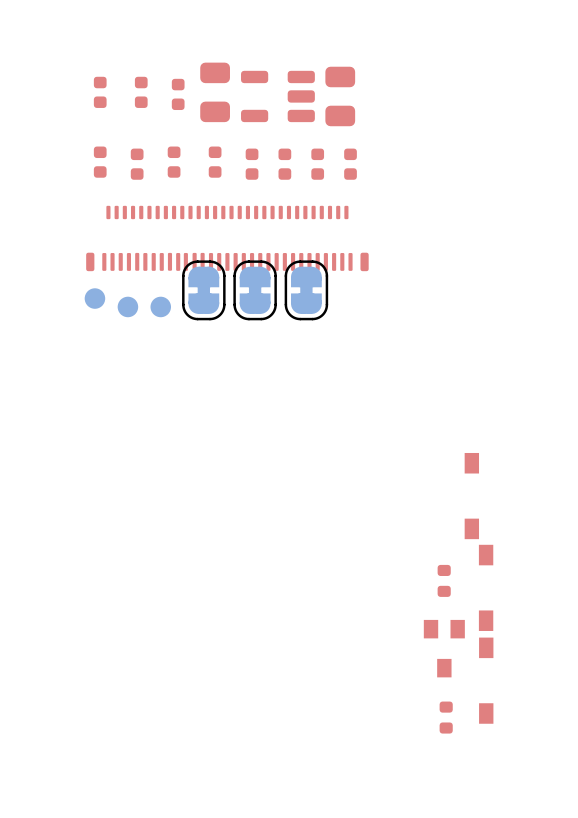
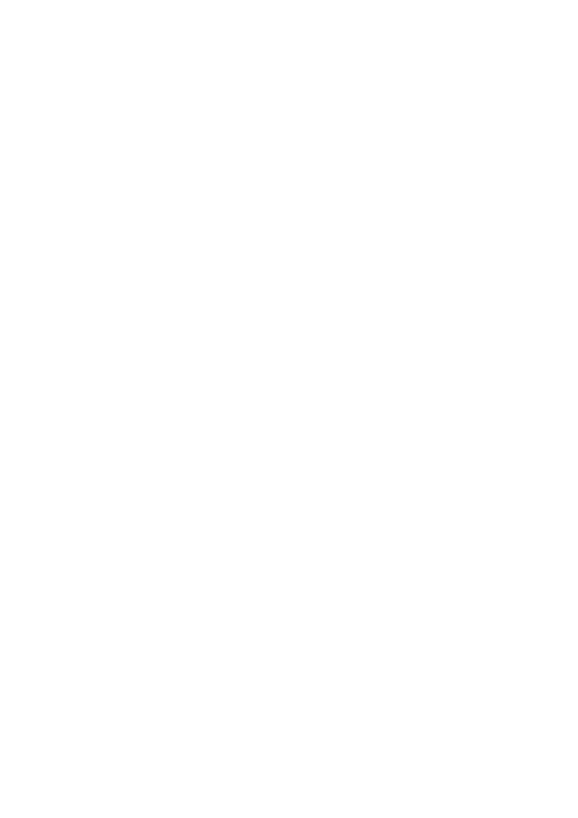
part: (100, 92) -> none
part: (141, 92) -> none
part: (215, 92) -> none
part: (178, 94) -> none
part: (277, 96) -> none
part: (340, 96) -> none
part: (100, 162) -> none
part: (174, 162) -> none
part: (215, 162) -> none
part: (137, 164) -> none
part: (252, 164) -> none
part: (284, 164) -> none
part: (317, 164) -> none
part: (350, 164) -> none
part: (227, 238) -> none
part: (203, 290) -> none
part: (255, 290) -> none
part: (306, 290) -> none
part: (94, 298) -> none
part: (127, 306) -> none
part: (160, 306) -> none
part: (471, 496) -> none
part: (444, 580) -> none
part: (486, 587) -> none
part: (444, 648) -> none
part: (486, 680) -> none
part: (446, 717) -> none

